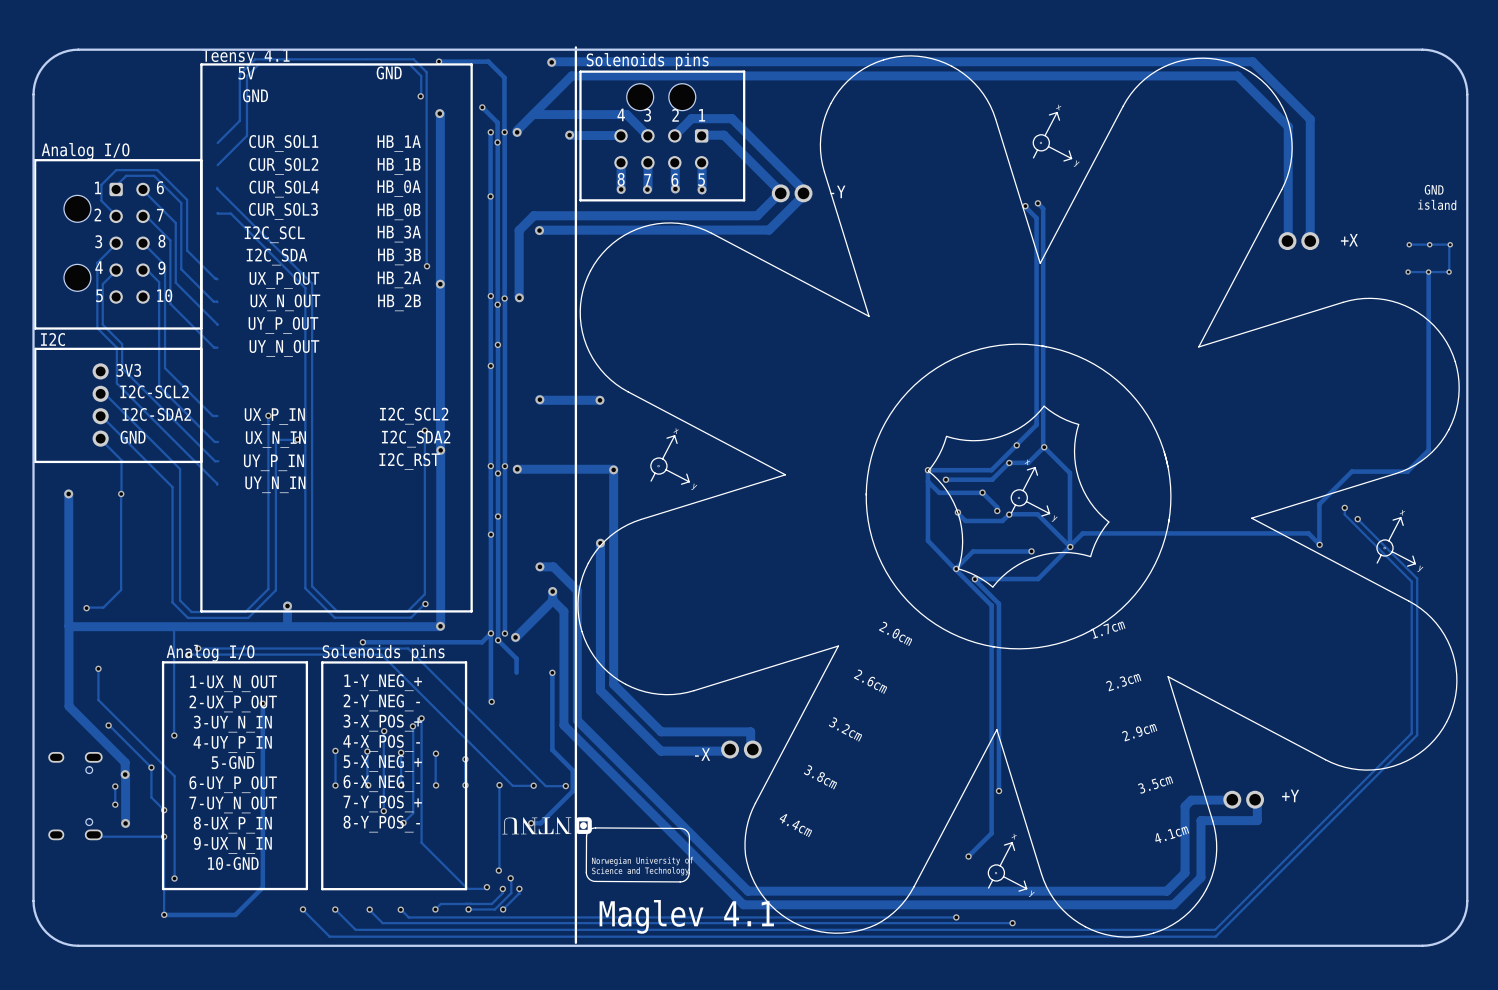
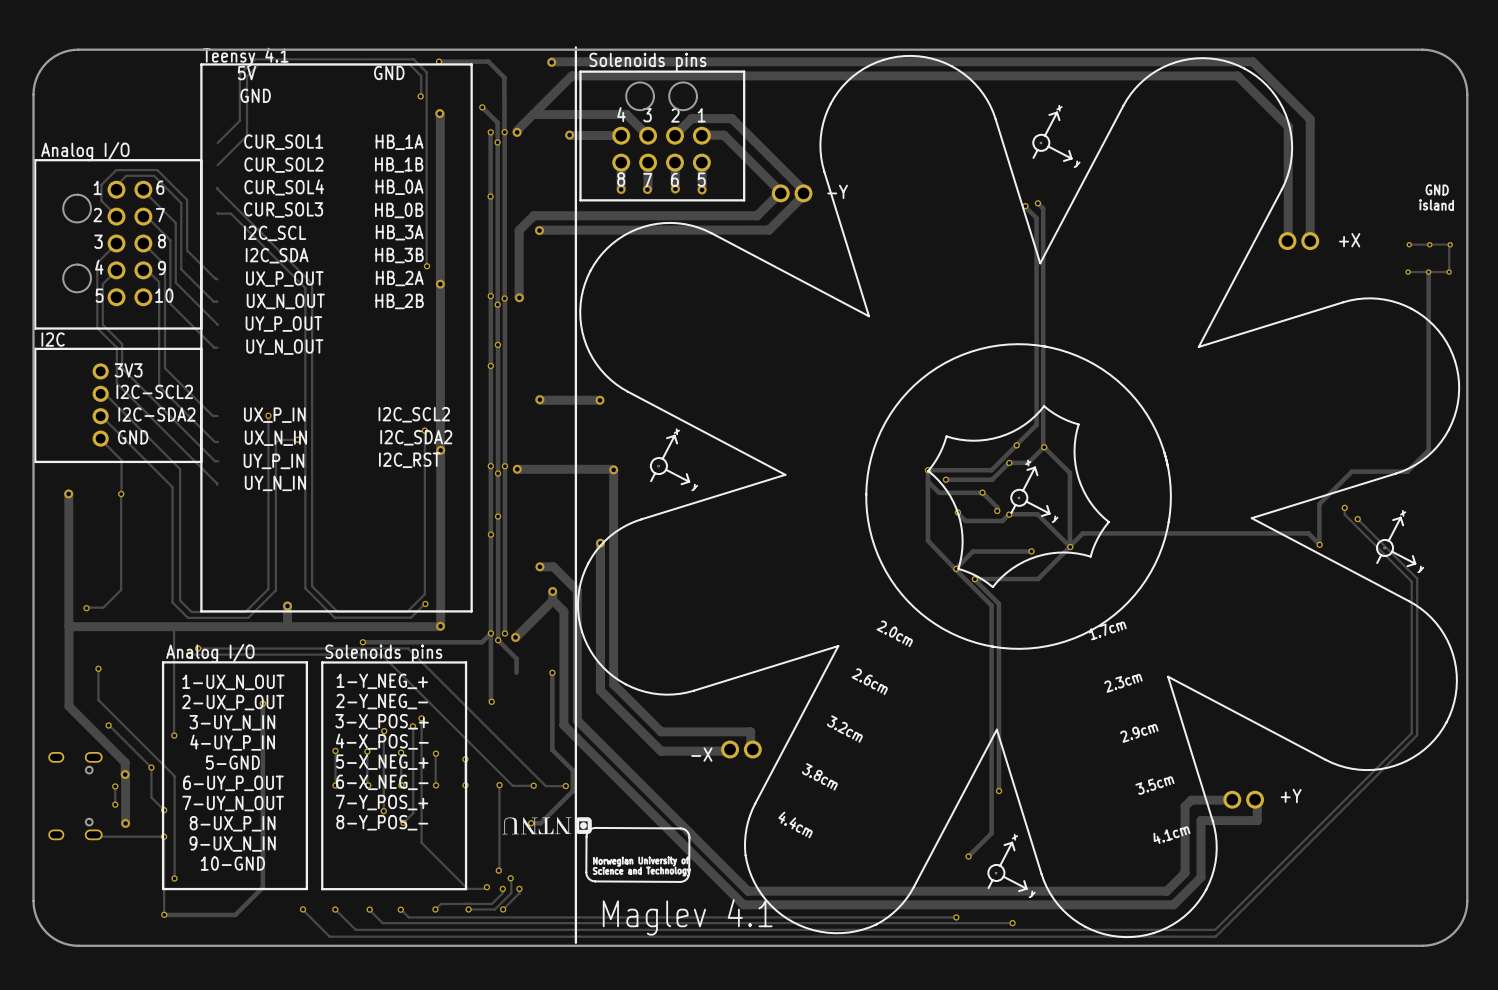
part footprint: [614, 83, 709, 170] -> [612, 82, 711, 172]
part footprint: [63, 182, 150, 304] -> [63, 180, 153, 307]

